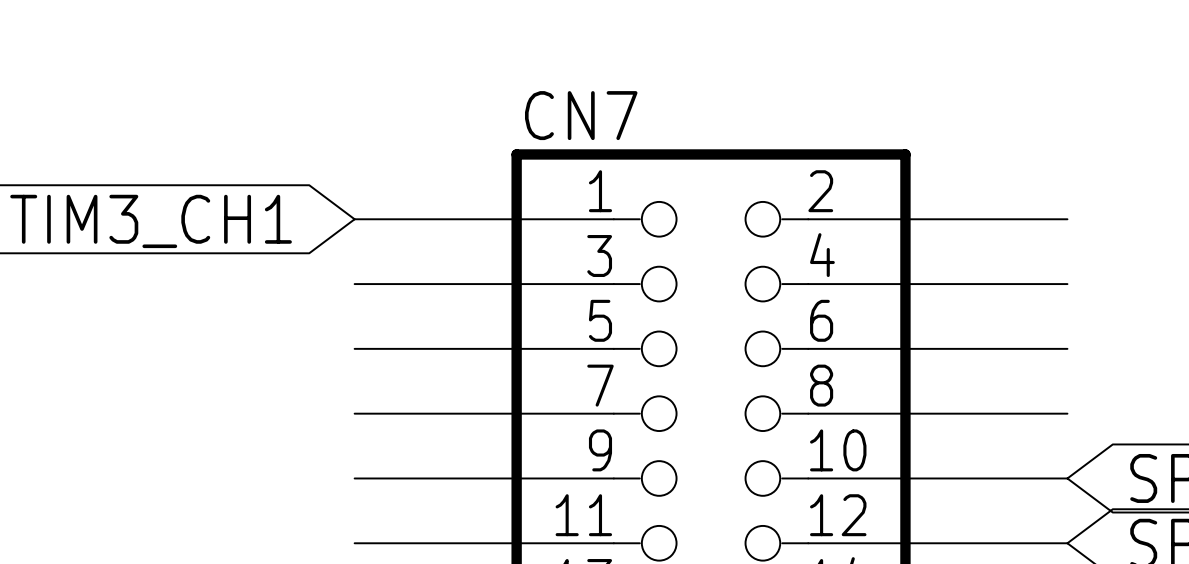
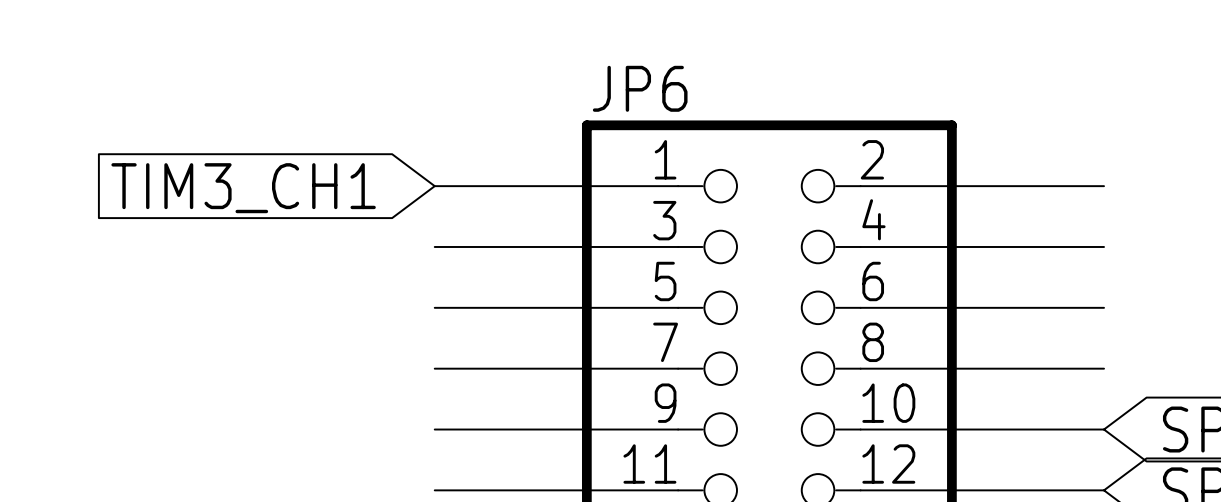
CN7 name: CN7 (581, 115) -> JP6 (640, 88)

